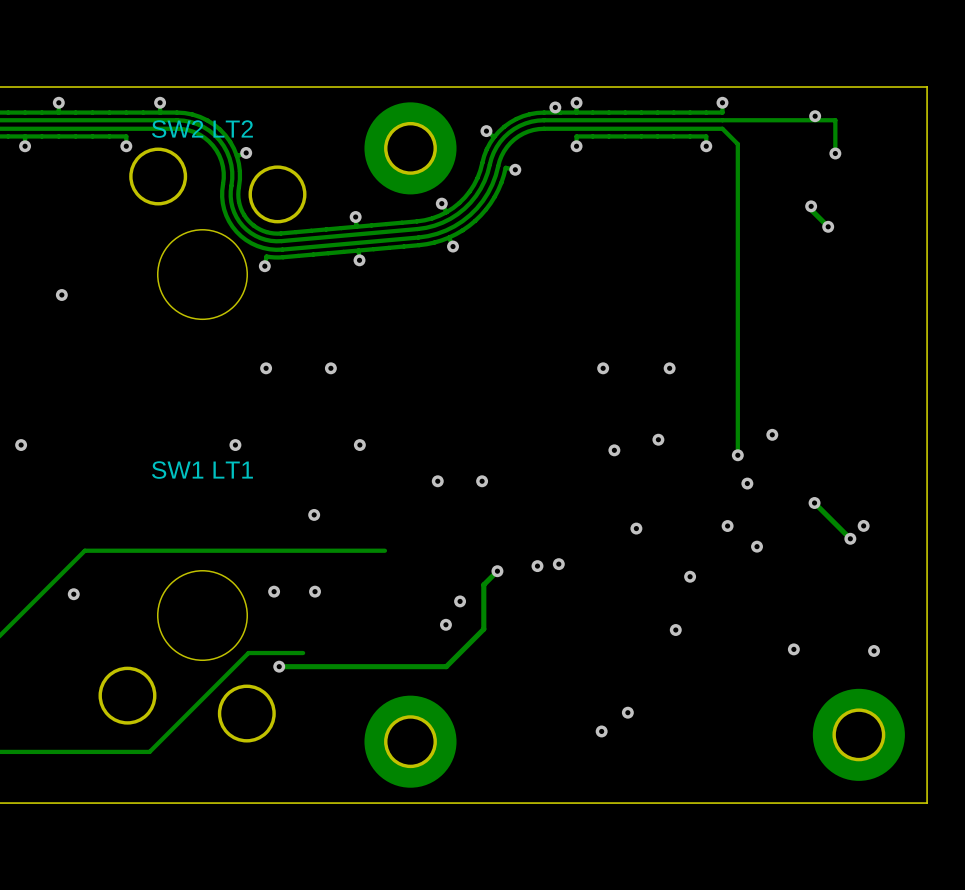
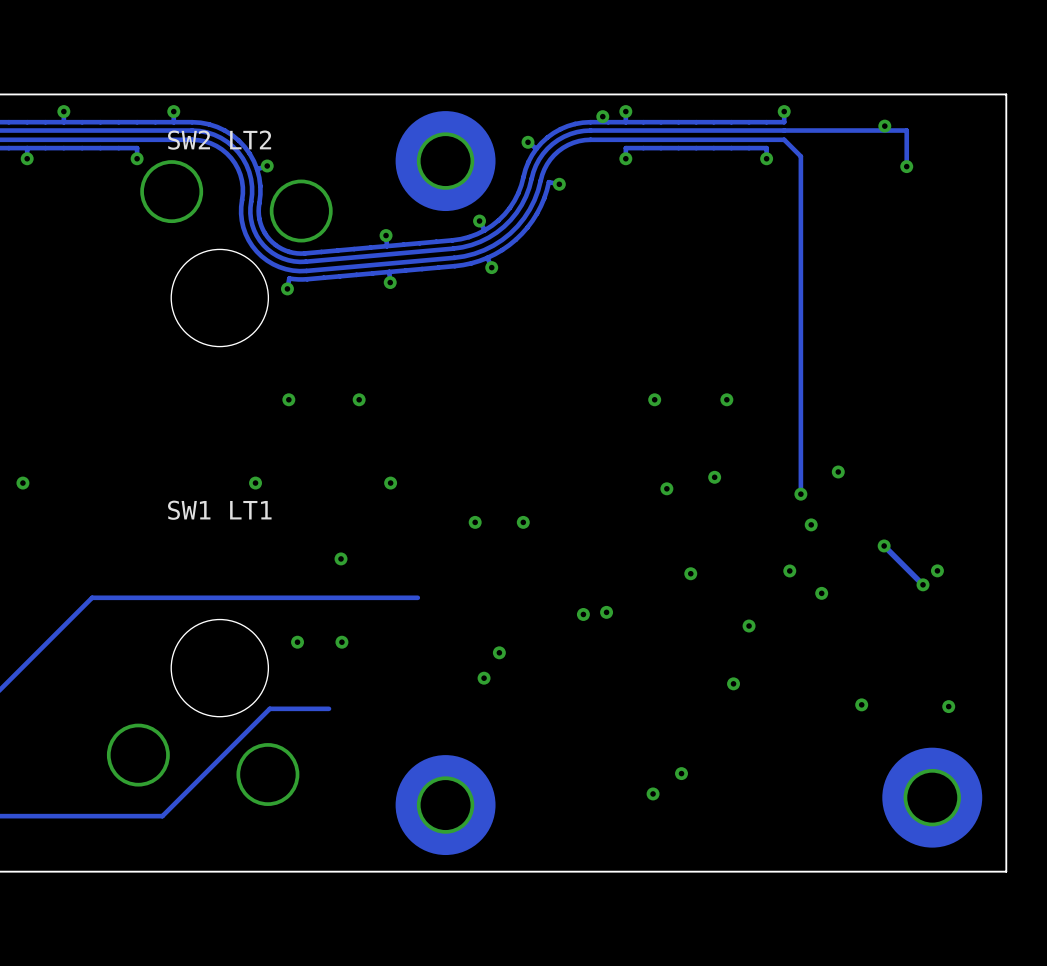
track: (811, 206) (811, 209) (828, 226) -> none
via: (811, 206) -> none
via: (828, 226) -> none
via: (61, 295) -> none
track: (497, 571) (483, 584) (483, 629) (446, 666) (279, 666) -> none
via: (497, 571) -> none
via: (73, 594) -> none
via: (279, 666) -> none

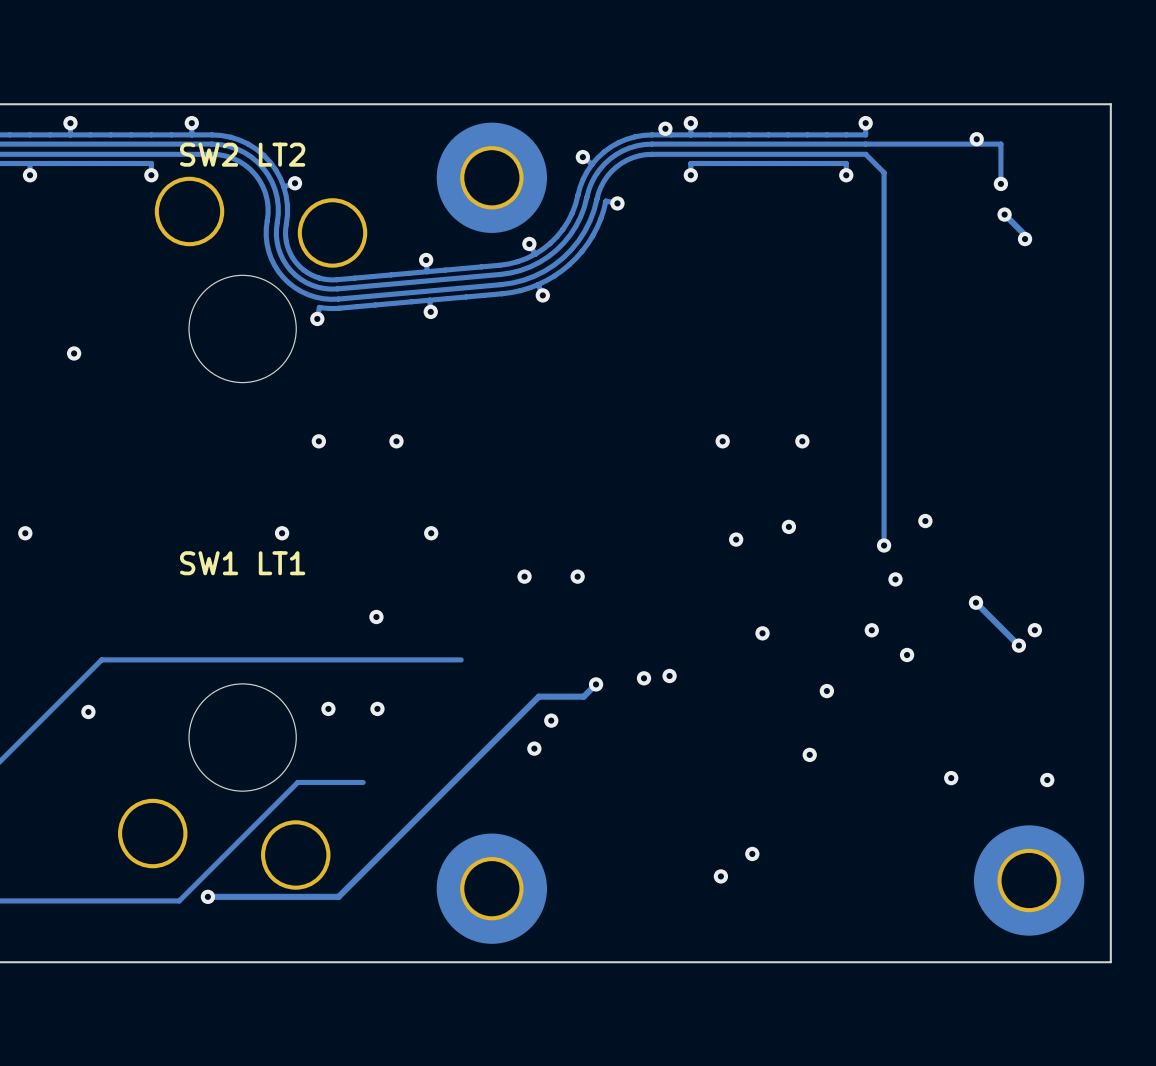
track: none -> (1004, 214) (1025, 234) (1025, 239)
via: none -> (1004, 214)
via: none -> (1025, 239)
via: none -> (74, 353)
track: none -> (596, 684) (583, 696) (538, 696) (338, 896) (207, 896)
via: none -> (596, 684)
via: none -> (88, 711)
via: none -> (207, 896)

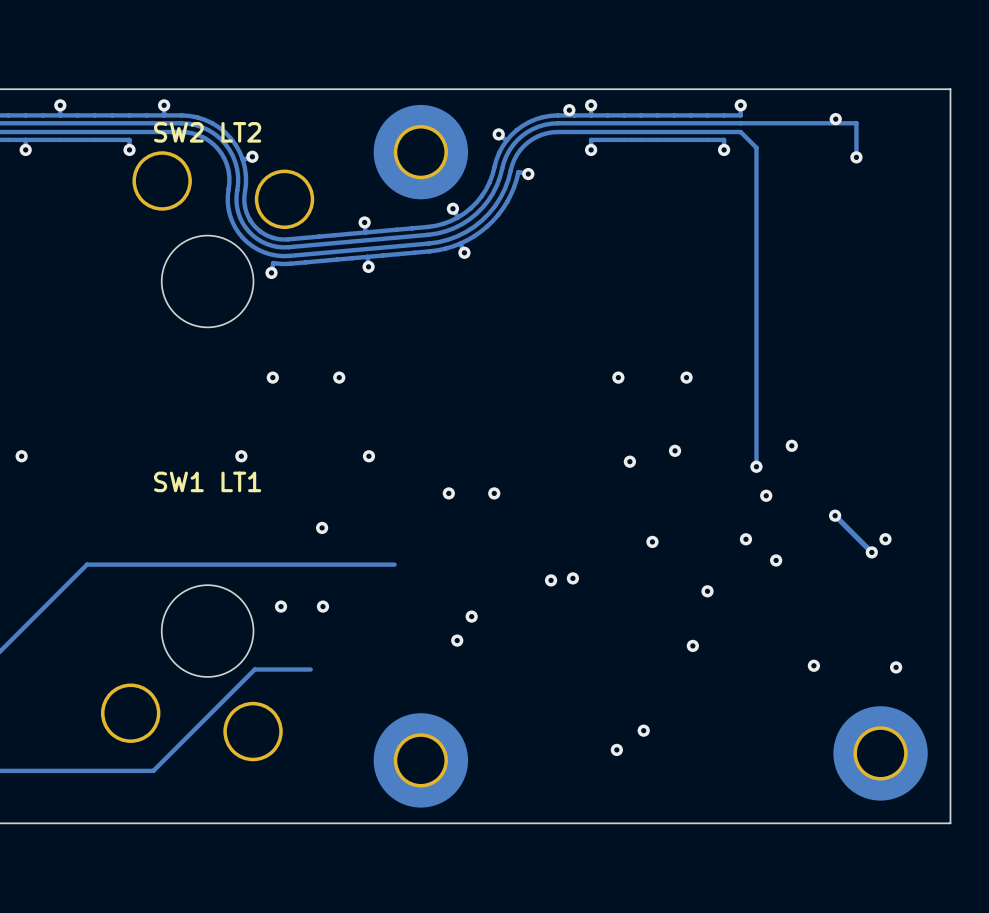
track: (1004, 214) (1025, 234) (1025, 239) -> none
via: (1004, 214) -> none
via: (1025, 239) -> none
via: (74, 353) -> none
track: (596, 684) (583, 696) (538, 696) (338, 896) (207, 896) -> none
via: (596, 684) -> none
via: (88, 711) -> none
via: (207, 896) -> none

